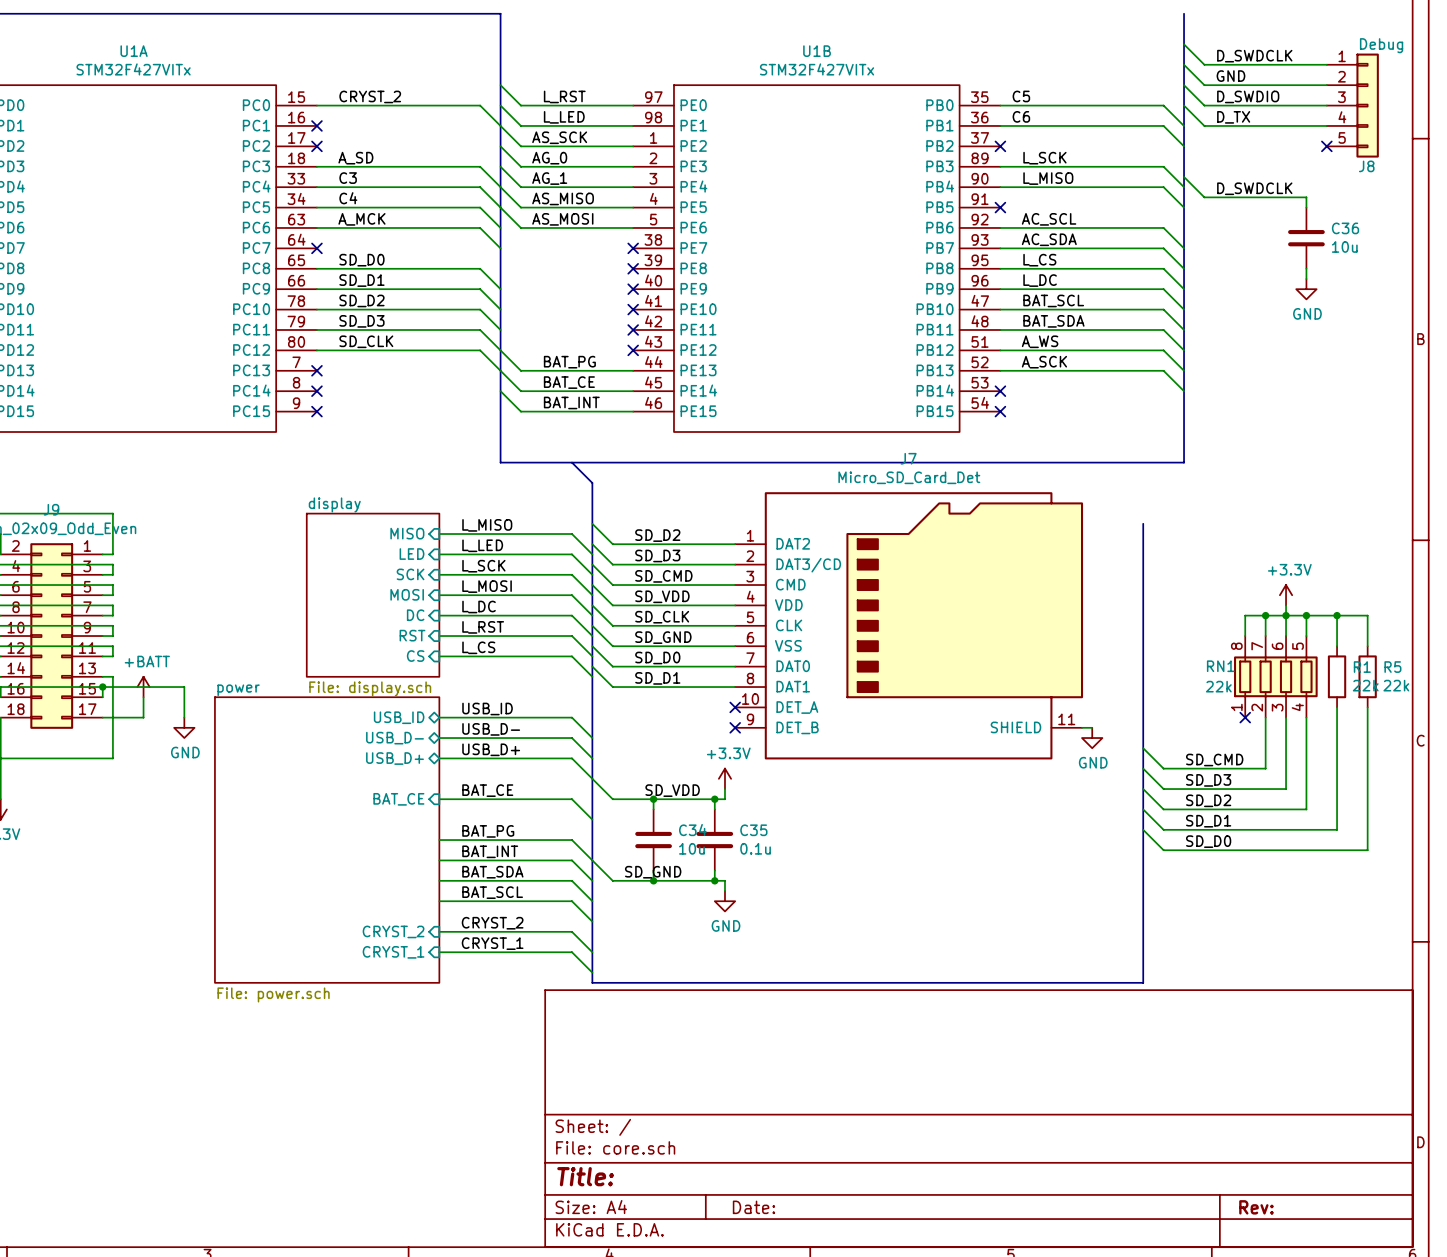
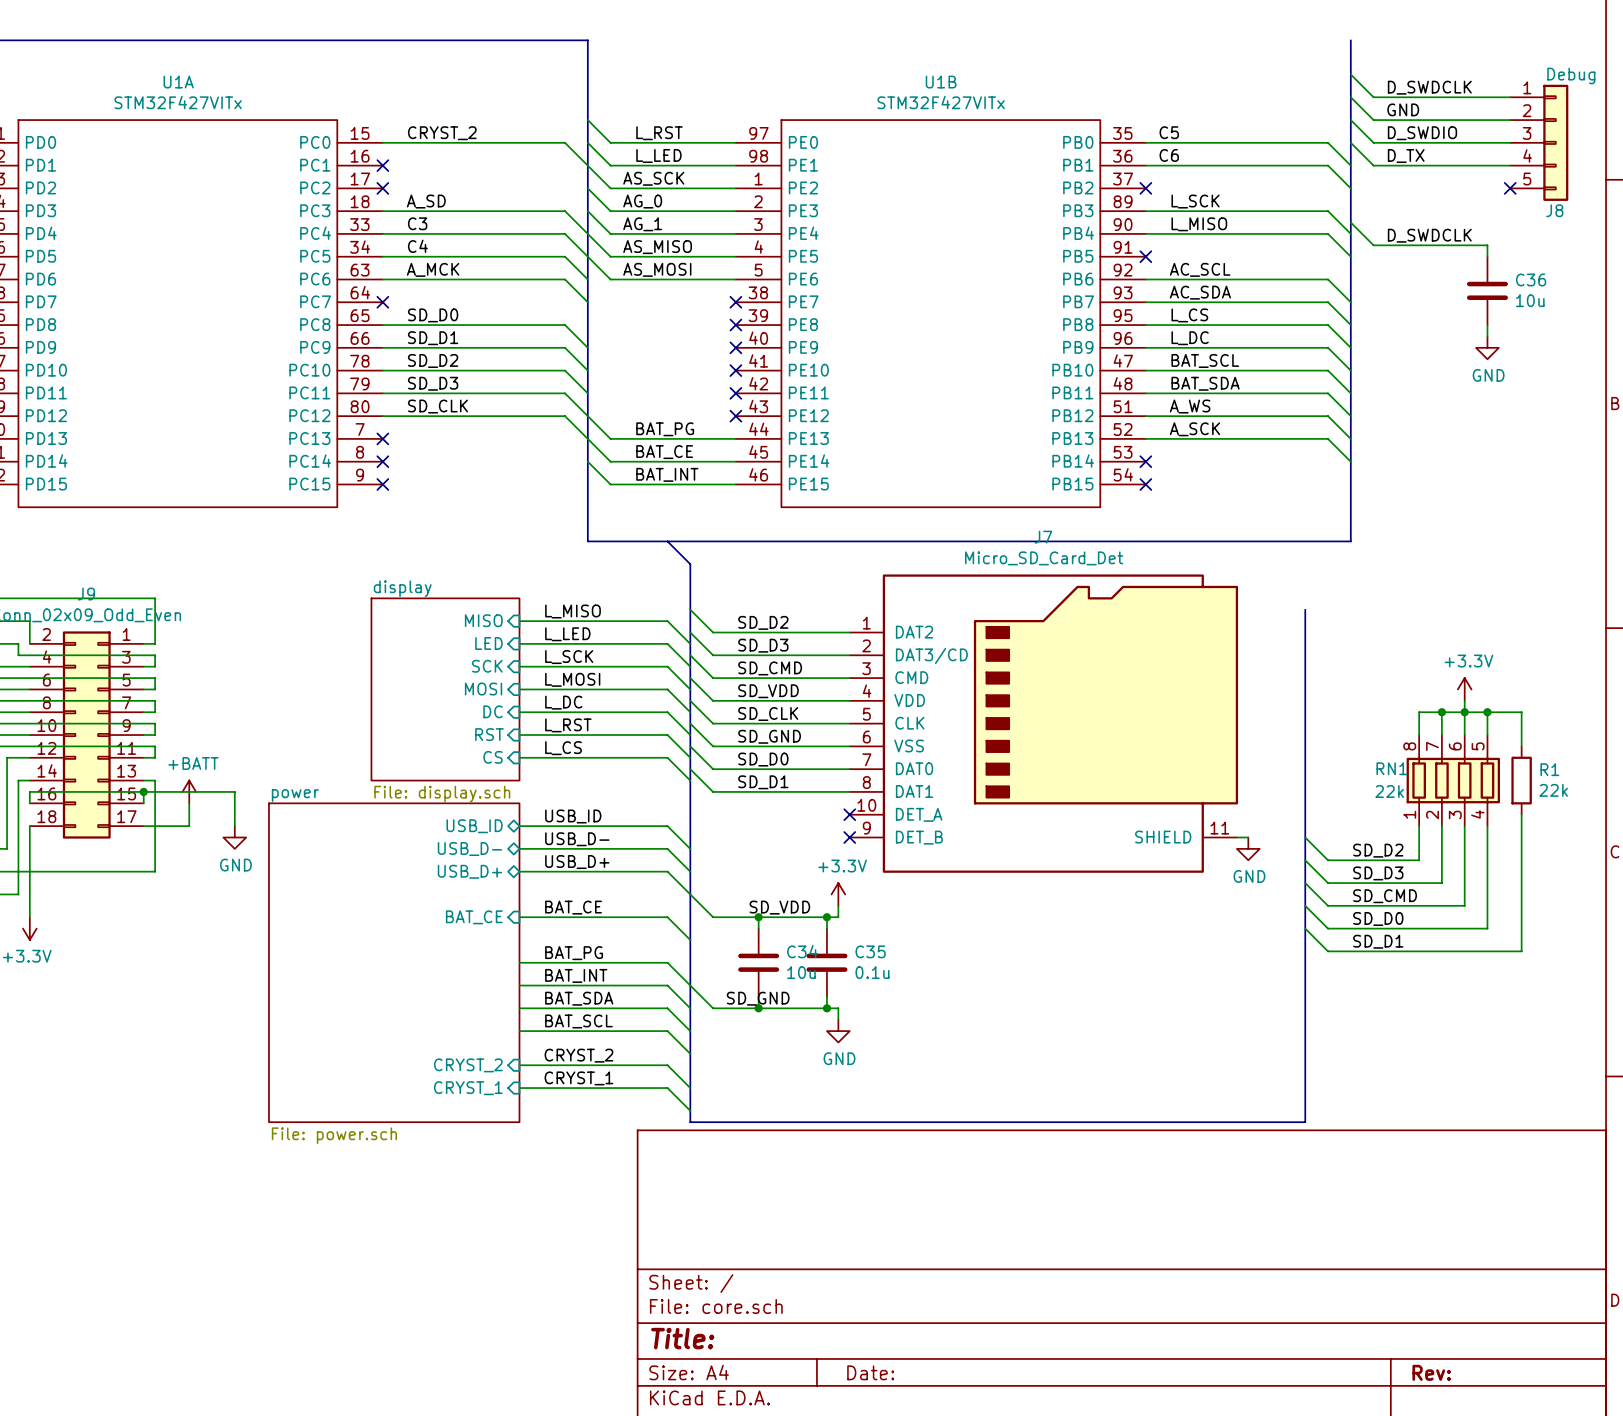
wire: (1337, 615) (1367, 615) (1367, 646) -> none
junction: (1337, 615) -> none
R5: 22k (1367, 676) -> none
wire: (1367, 707) (1367, 850) (1163, 850) (1143, 829) -> none
wire: none -> (1419, 826) (1419, 860) (1328, 860) (1305, 837)
no-connect mark: (1245, 717) -> none
label: none -> SD_D2 (1378, 850)
label: SD_CMD (1214, 760) -> SD_D3 (1378, 873)
label: SD_D3 (1208, 780) -> SD_CMD (1385, 896)
label: SD_D2 (1208, 800) -> SD_D0 (1378, 918)
label: SD_D0 (1208, 841) -> none

